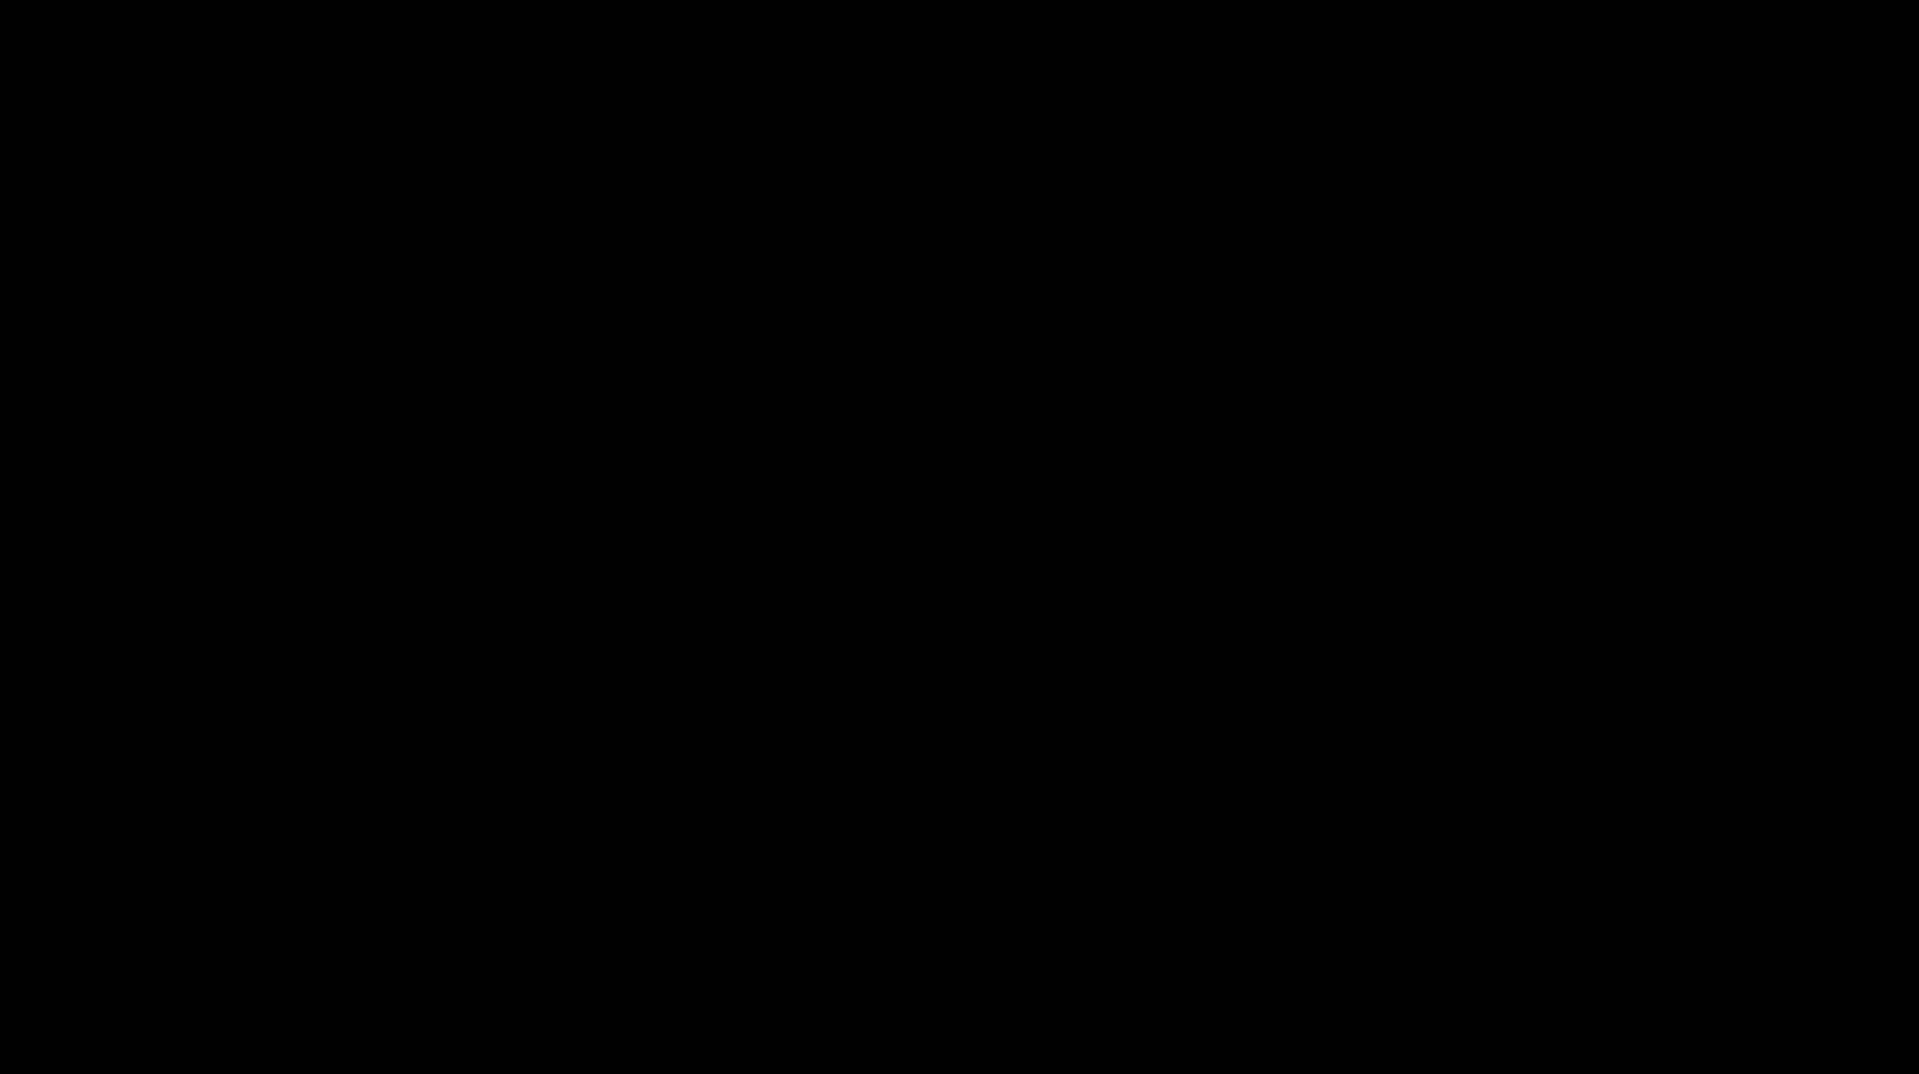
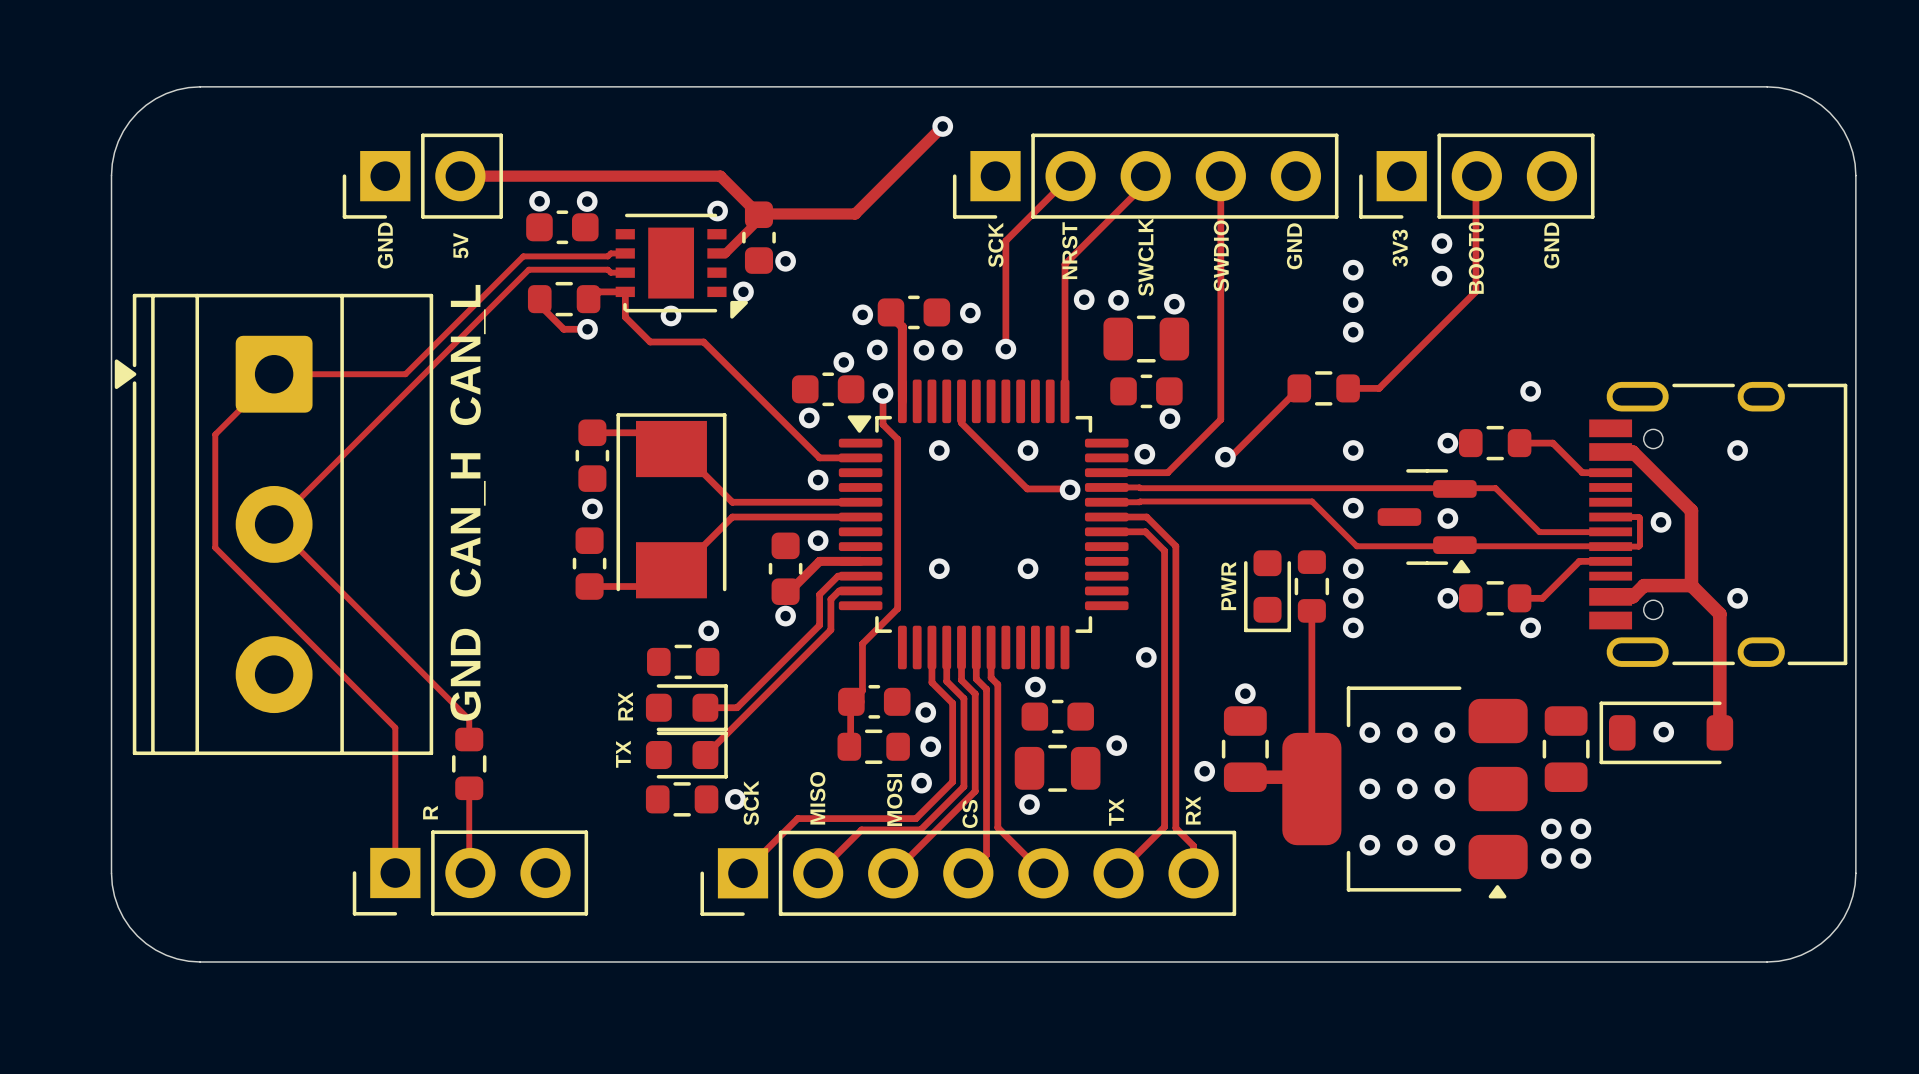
board edge: none -> (200, 86) (1767, 86) (1790, 89) (1811, 98) (1829, 112) (1843, 131) (1852, 152) (1855, 175) (1855, 873) (1852, 896) (1843, 917) (1829, 936) (1811, 950) (1790, 958) (1767, 961) (200, 961) (177, 958) (155, 950) (137, 936) (123, 917) (114, 896) (111, 873) (111, 175) (112, 163) (118, 141) (129, 121) (137, 112) (155, 98) (166, 93) (177, 89) (200, 86)
track: none -> (942, 126) (855, 213) (758, 214)
via: none -> (942, 126)
track: none -> (1475, 175) (1475, 291) (1379, 388) (1348, 388)
part: none -> (422, 176)
track: none -> (460, 176) (720, 176) (758, 214)
track: none -> (1070, 176) (1005, 240) (1005, 349)
track: none -> (1145, 176) (1145, 183) (1064, 264) (1064, 401)
part: none -> (1145, 176)
track: none -> (1220, 176) (1220, 419) (1167, 472) (1106, 472)
part: none -> (1476, 176)
via: none -> (539, 201)
via: none -> (587, 201)
via: none -> (717, 211)
track: none -> (758, 214) (758, 219) (725, 253) (716, 253)
part: none -> (562, 227)
part: none -> (758, 237)
via: none -> (1441, 243)
text: none -> 5V (460, 245)
text: none -> 3V3 (1400, 248)
text: none -> SCK (995, 245)
text: none -> GND (385, 245)
text: none -> GND (1551, 245)
text: none -> GND (1294, 246)
track: none -> (625, 253) (610, 253) (607, 256) (523, 256) (405, 374) (274, 374)
text: none -> NRST (1069, 250)
via: none -> (785, 261)
text: none -> SWDIO (1221, 256)
text: none -> BOOT0 (1476, 258)
text: none -> SWCLK (1145, 257)
part: none -> (681, 266)
via: none -> (1353, 270)
track: none -> (625, 272) (610, 272) (607, 269) (528, 269) (274, 524) (469, 719) (469, 739)
via: none -> (1441, 276)
via: none -> (743, 291)
part: none -> (564, 299)
via: none -> (1084, 299)
via: none -> (1118, 300)
track: none -> (588, 302) (599, 291) (625, 291) (625, 317) (650, 342) (703, 342) (819, 457) (860, 457)
via: none -> (1353, 302)
track: none -> (538, 304) (563, 329) (587, 329)
via: none -> (1174, 304)
part: none -> (913, 312)
via: none -> (970, 313)
via: none -> (862, 314)
track: none -> (890, 314) (902, 326) (902, 401)
via: none -> (671, 315)
via: none -> (587, 329)
via: none -> (1353, 332)
part: none -> (1146, 339)
via: none -> (877, 349)
via: none -> (952, 349)
via: none -> (1005, 349)
via: none -> (923, 350)
via: none -> (843, 362)
text: none -> CAN_L (468, 355)
track: none -> (275, 374) (215, 434) (215, 547) (395, 727) (395, 873)
track: none -> (1299, 388) (1230, 457) (1225, 457)
part: none -> (1323, 388)
part: none -> (828, 389)
part: none -> (1146, 391)
via: none -> (1530, 391)
track: none -> (883, 393) (883, 424) (897, 439) (897, 608) (862, 643) (862, 690) (850, 702) (851, 746) (849, 746)
via: none -> (883, 393)
via: none -> (809, 417)
via: none -> (1169, 418)
track: none -> (961, 423) (1027, 488) (1070, 489)
track: none -> (592, 432) (677, 432) (693, 449) (693, 463) (732, 502) (860, 502)
via: none -> (1447, 443)
part: none -> (1495, 443)
track: none -> (1519, 443) (1552, 443) (1582, 472) (1610, 472)
via: none -> (939, 450)
via: none -> (1028, 450)
via: none -> (1353, 450)
via: none -> (1737, 450)
track: none -> (1610, 451) (1632, 451) (1691, 510) (1691, 585)
via: none -> (1144, 454)
part: none -> (592, 455)
via: none -> (1225, 457)
via: none -> (818, 480)
track: none -> (1106, 487) (1495, 488) (1539, 532) (1610, 532)
via: none -> (1070, 489)
track: none -> (1106, 502) (1312, 501) (1356, 546) (1610, 546)
part: none -> (671, 505)
via: none -> (592, 508)
via: none -> (1353, 508)
track: none -> (1613, 516) (1610, 517) (1639, 518) (1639, 545) (1610, 546)
track: none -> (860, 517) (732, 517) (693, 555) (693, 570) (677, 586) (589, 586)
track: none -> (1106, 517) (1146, 517) (1175, 546) (1175, 828) (1193, 845) (1193, 873)
via: none -> (1447, 518)
part: none -> (1427, 521)
via: none -> (1661, 522)
part: none -> (273, 524)
part: none -> (983, 524)
part: none -> (1718, 524)
track: none -> (1106, 531) (1145, 531) (1164, 550) (1164, 826) (1118, 873)
text: none -> CAN_H (468, 524)
via: none -> (818, 540)
track: none -> (860, 561) (819, 561) (789, 591)
track: none -> (1610, 561) (1579, 561) (1542, 598) (1519, 598)
part: none -> (589, 563)
part: none -> (785, 568)
via: none -> (939, 568)
via: none -> (1028, 568)
via: none -> (1353, 568)
track: none -> (860, 576) (838, 576) (819, 594) (819, 625) (737, 707) (705, 707) (709, 703)
text: none -> PWR (1228, 586)
track: none -> (1691, 585) (1719, 614) (1719, 732)
track: none -> (1691, 585) (1643, 585) (1632, 596) (1610, 596)
part: none -> (1311, 586)
track: none -> (860, 590) (839, 590) (830, 599) (830, 629) (705, 755)
part: none -> (1267, 591)
via: none -> (1353, 598)
via: none -> (1447, 598)
part: none -> (1495, 598)
via: none -> (1737, 598)
track: none -> (1311, 610) (1311, 789) (1300, 777) (1245, 777)
via: none -> (785, 616)
via: none -> (1353, 627)
via: none -> (1530, 627)
via: none -> (708, 630)
track: none -> (931, 647) (931, 682) (952, 703) (952, 781) (915, 818) (797, 818) (743, 873)
track: none -> (946, 647) (946, 681) (963, 698) (963, 786) (920, 829) (861, 829) (818, 873)
track: none -> (961, 647) (961, 680) (975, 693) (975, 791) (893, 873)
track: none -> (976, 647) (976, 679) (986, 689) (986, 855) (968, 873)
track: none -> (991, 647) (991, 677) (997, 684) (997, 827) (1043, 873)
via: none -> (1146, 657)
part: none -> (683, 661)
text: none -> GND (465, 674)
via: none -> (1035, 687)
via: none -> (1245, 693)
part: none -> (874, 701)
text: none -> RX (625, 706)
part: none -> (686, 707)
via: none -> (925, 712)
part: none -> (1057, 716)
via: none -> (1369, 732)
via: none -> (1407, 732)
via: none -> (1444, 732)
via: none -> (1663, 732)
part: none -> (1666, 732)
via: none -> (1116, 745)
part: none -> (873, 746)
via: none -> (930, 746)
part: none -> (1245, 749)
part: none -> (1566, 749)
text: none -> TX (623, 754)
part: none -> (686, 755)
part: none -> (469, 763)
part: none -> (1057, 768)
via: none -> (1204, 771)
via: none -> (921, 783)
track: none -> (469, 788) (470, 873)
via: none -> (1369, 788)
via: none -> (1407, 788)
via: none -> (1444, 788)
part: none -> (1405, 792)
part: none -> (682, 799)
via: none -> (735, 799)
text: none -> MISO (817, 798)
text: none -> MOSI (894, 800)
via: none -> (1029, 804)
text: none -> SCK (751, 803)
text: none -> TX (1116, 812)
text: none -> RX (1193, 810)
text: none -> R (430, 812)
text: none -> CS (970, 814)
via: none -> (1551, 828)
via: none -> (1580, 828)
via: none -> (1369, 845)
via: none -> (1407, 845)
via: none -> (1444, 845)
via: none -> (1551, 858)
via: none -> (1580, 858)
part: none -> (470, 873)
part: none -> (968, 873)

